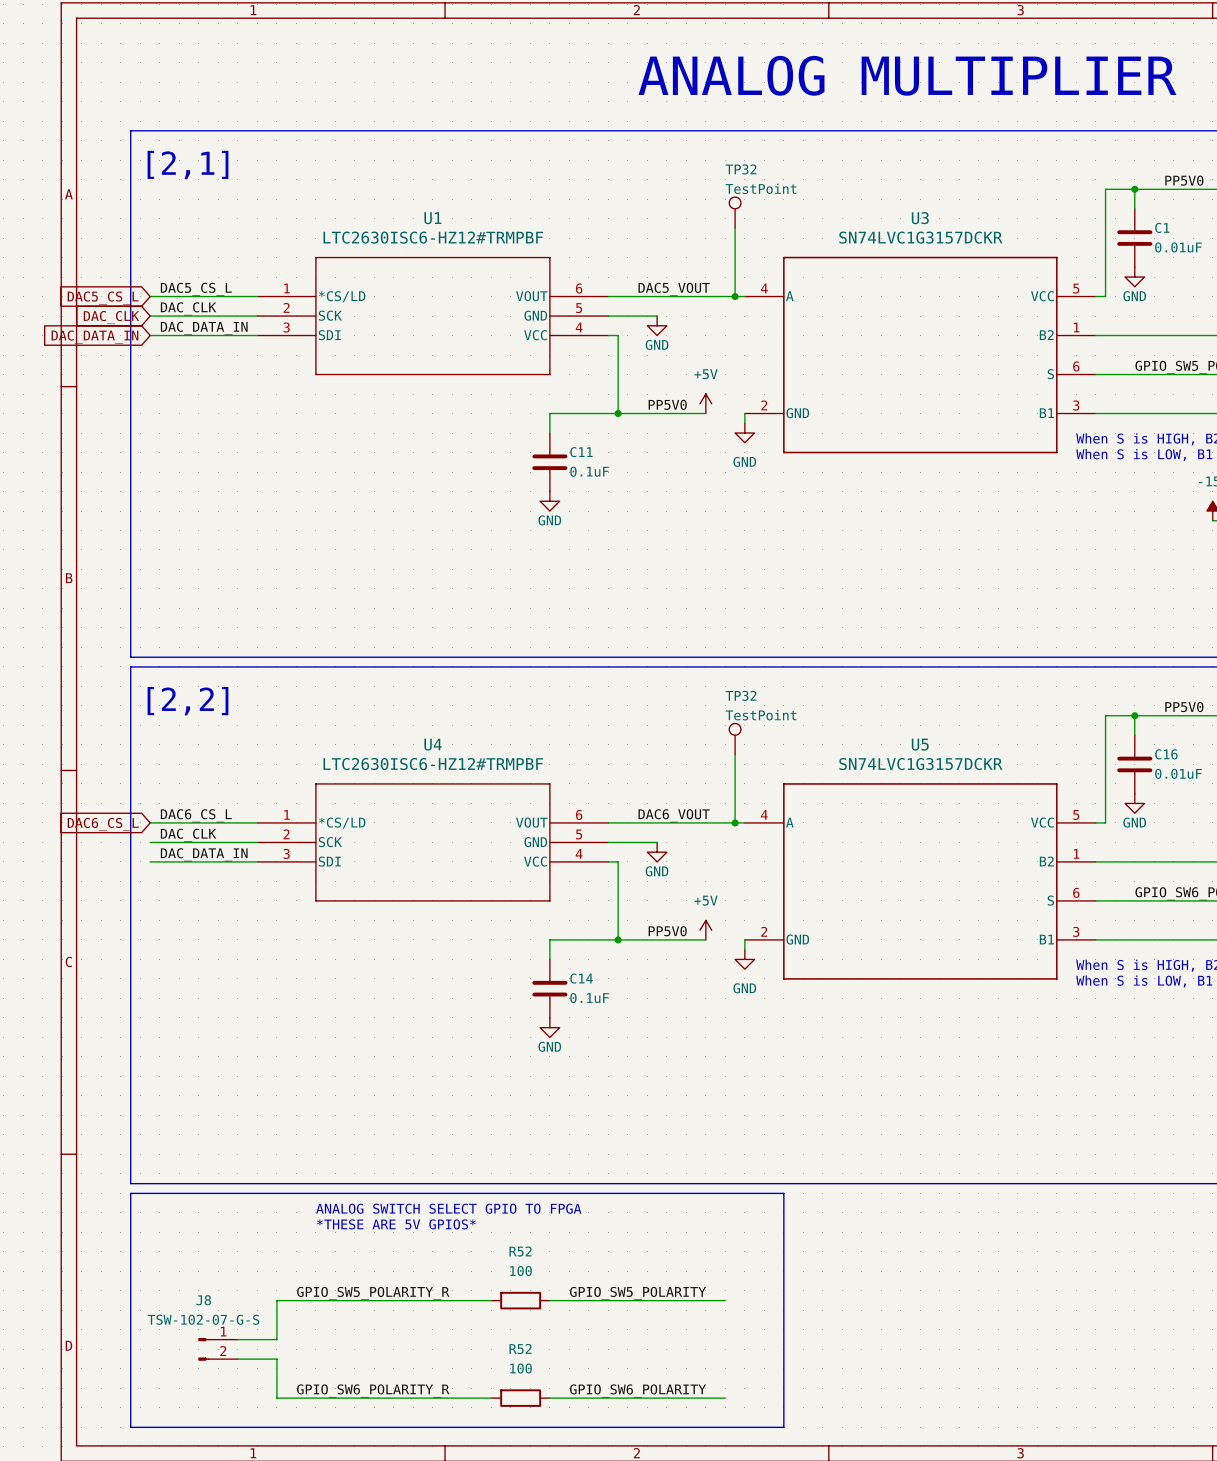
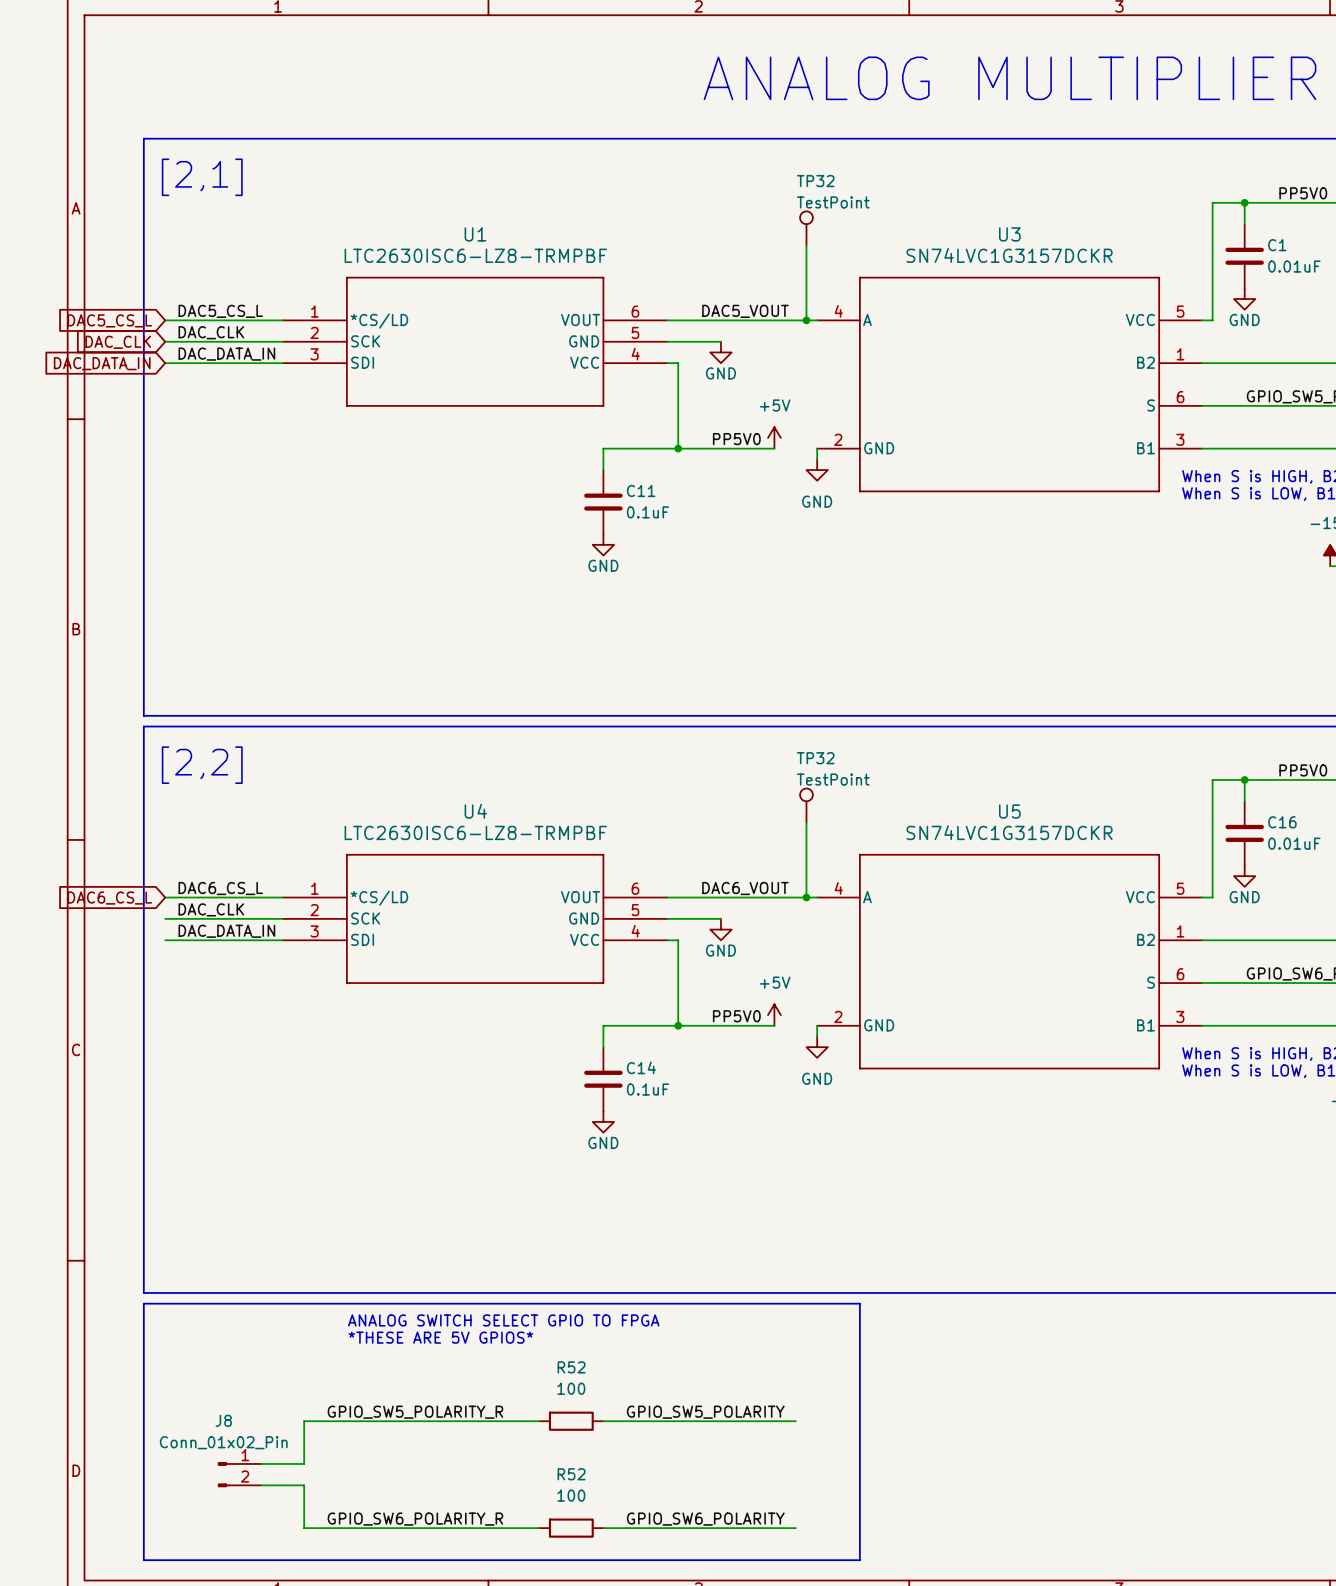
U1 value: LTC2630ISC6-HZ12#TRMPBF (433, 237) -> LTC2630ISC6-LZ8-TRMPBF (475, 255)
U4 value: LTC2630ISC6-HZ12#TRMPBF (433, 764) -> LTC2630ISC6-LZ8-TRMPBF (475, 832)
J8 value: TSW-102-07-G-S (203, 1319) -> Conn_01x02_Pin (223, 1442)

